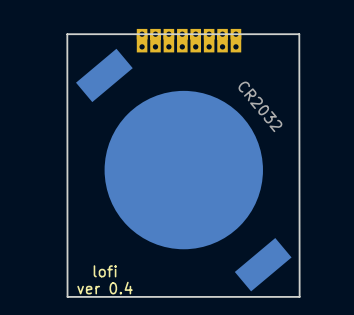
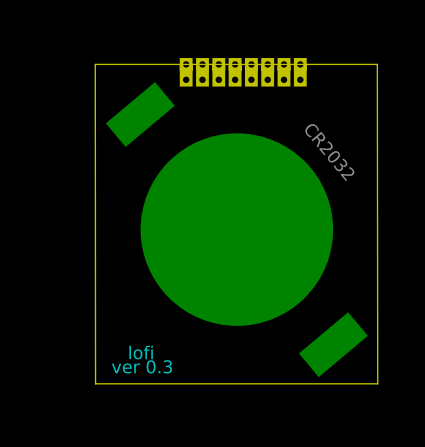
text: ver 0.4 (105, 288) -> ver 0.3 (141, 366)

